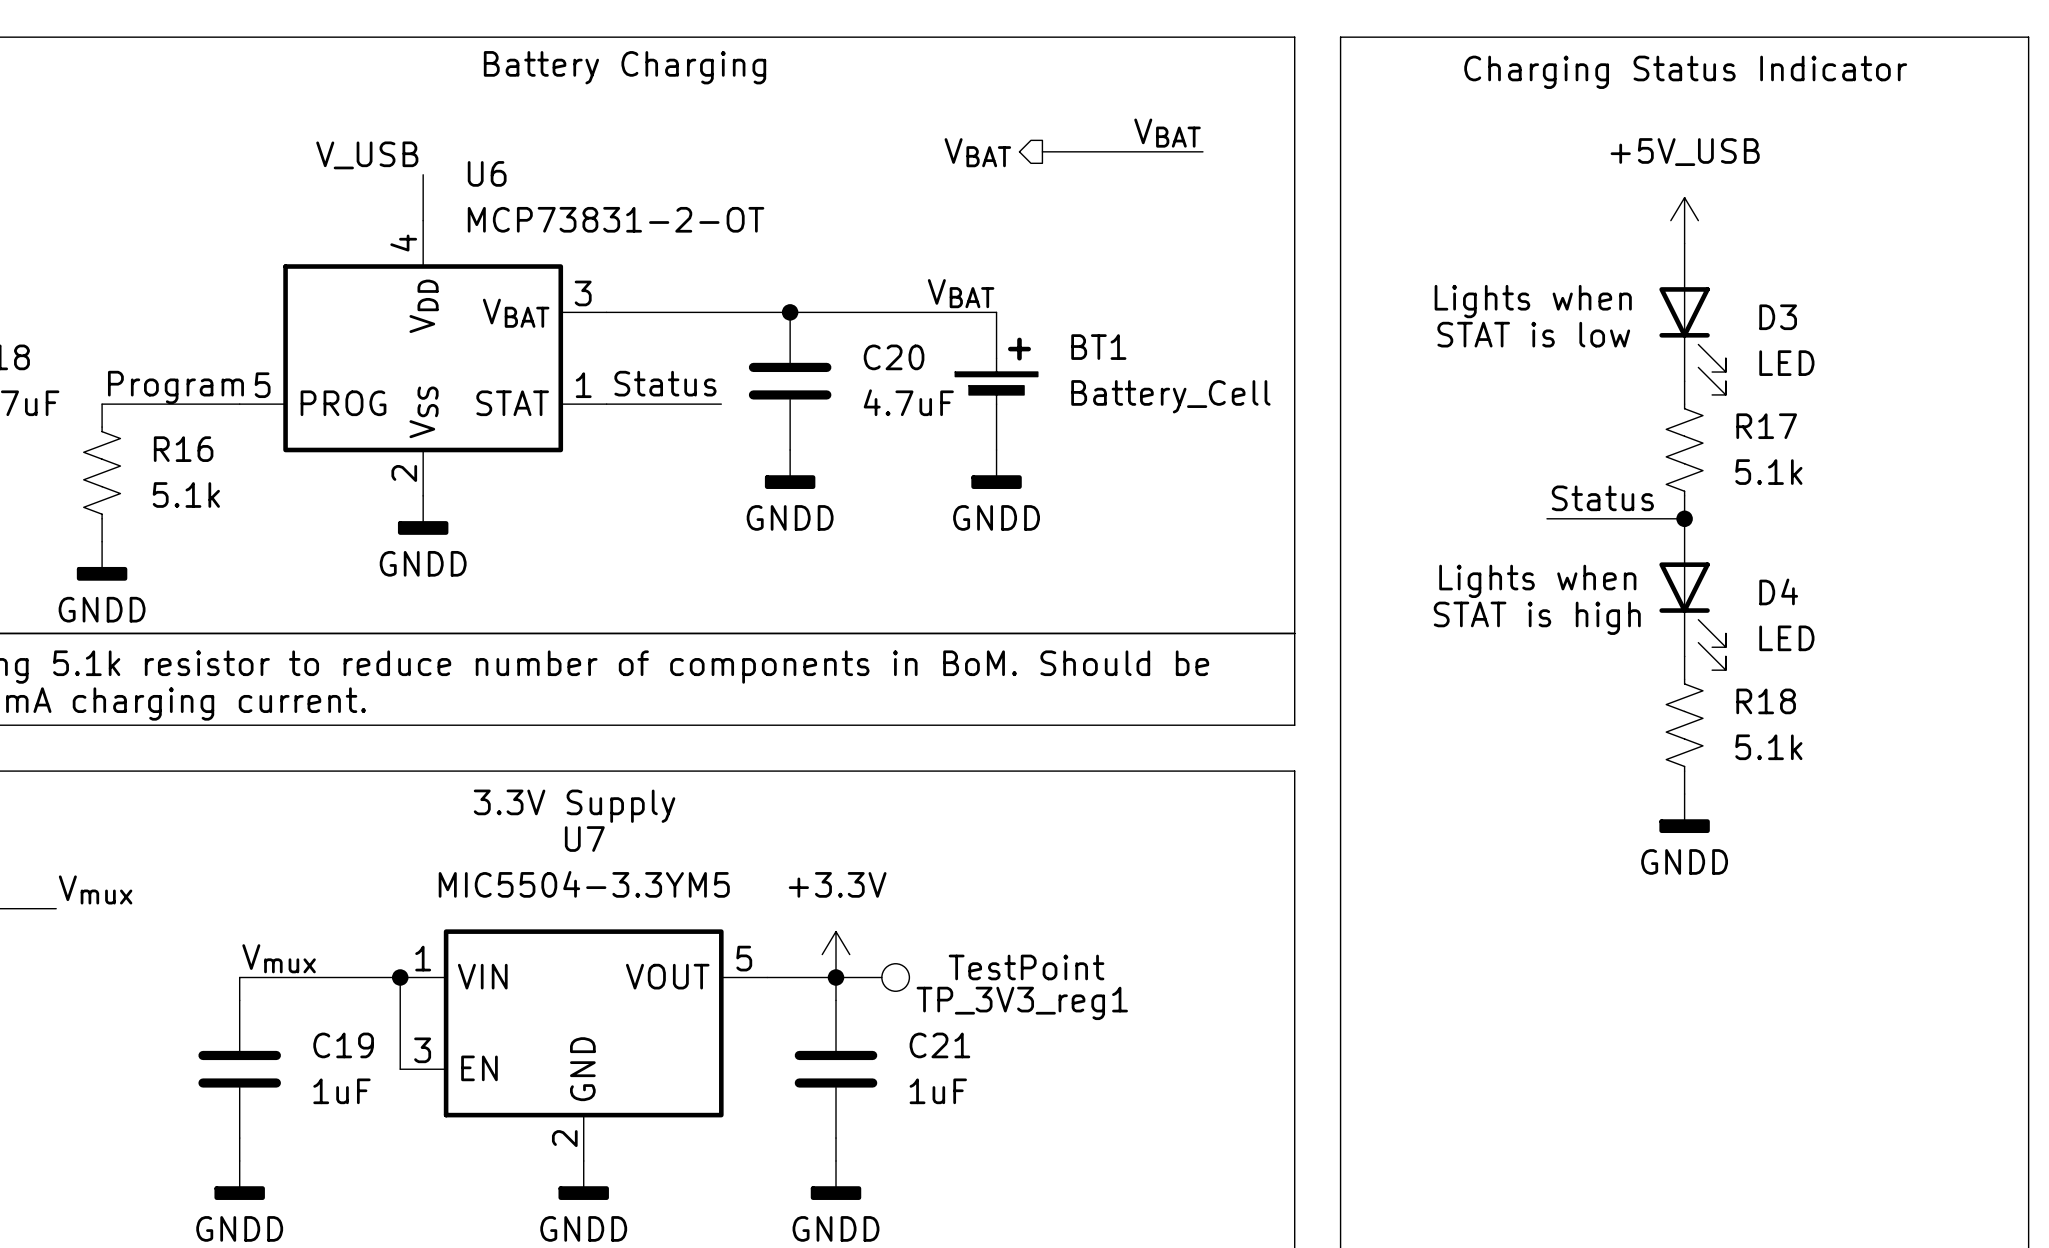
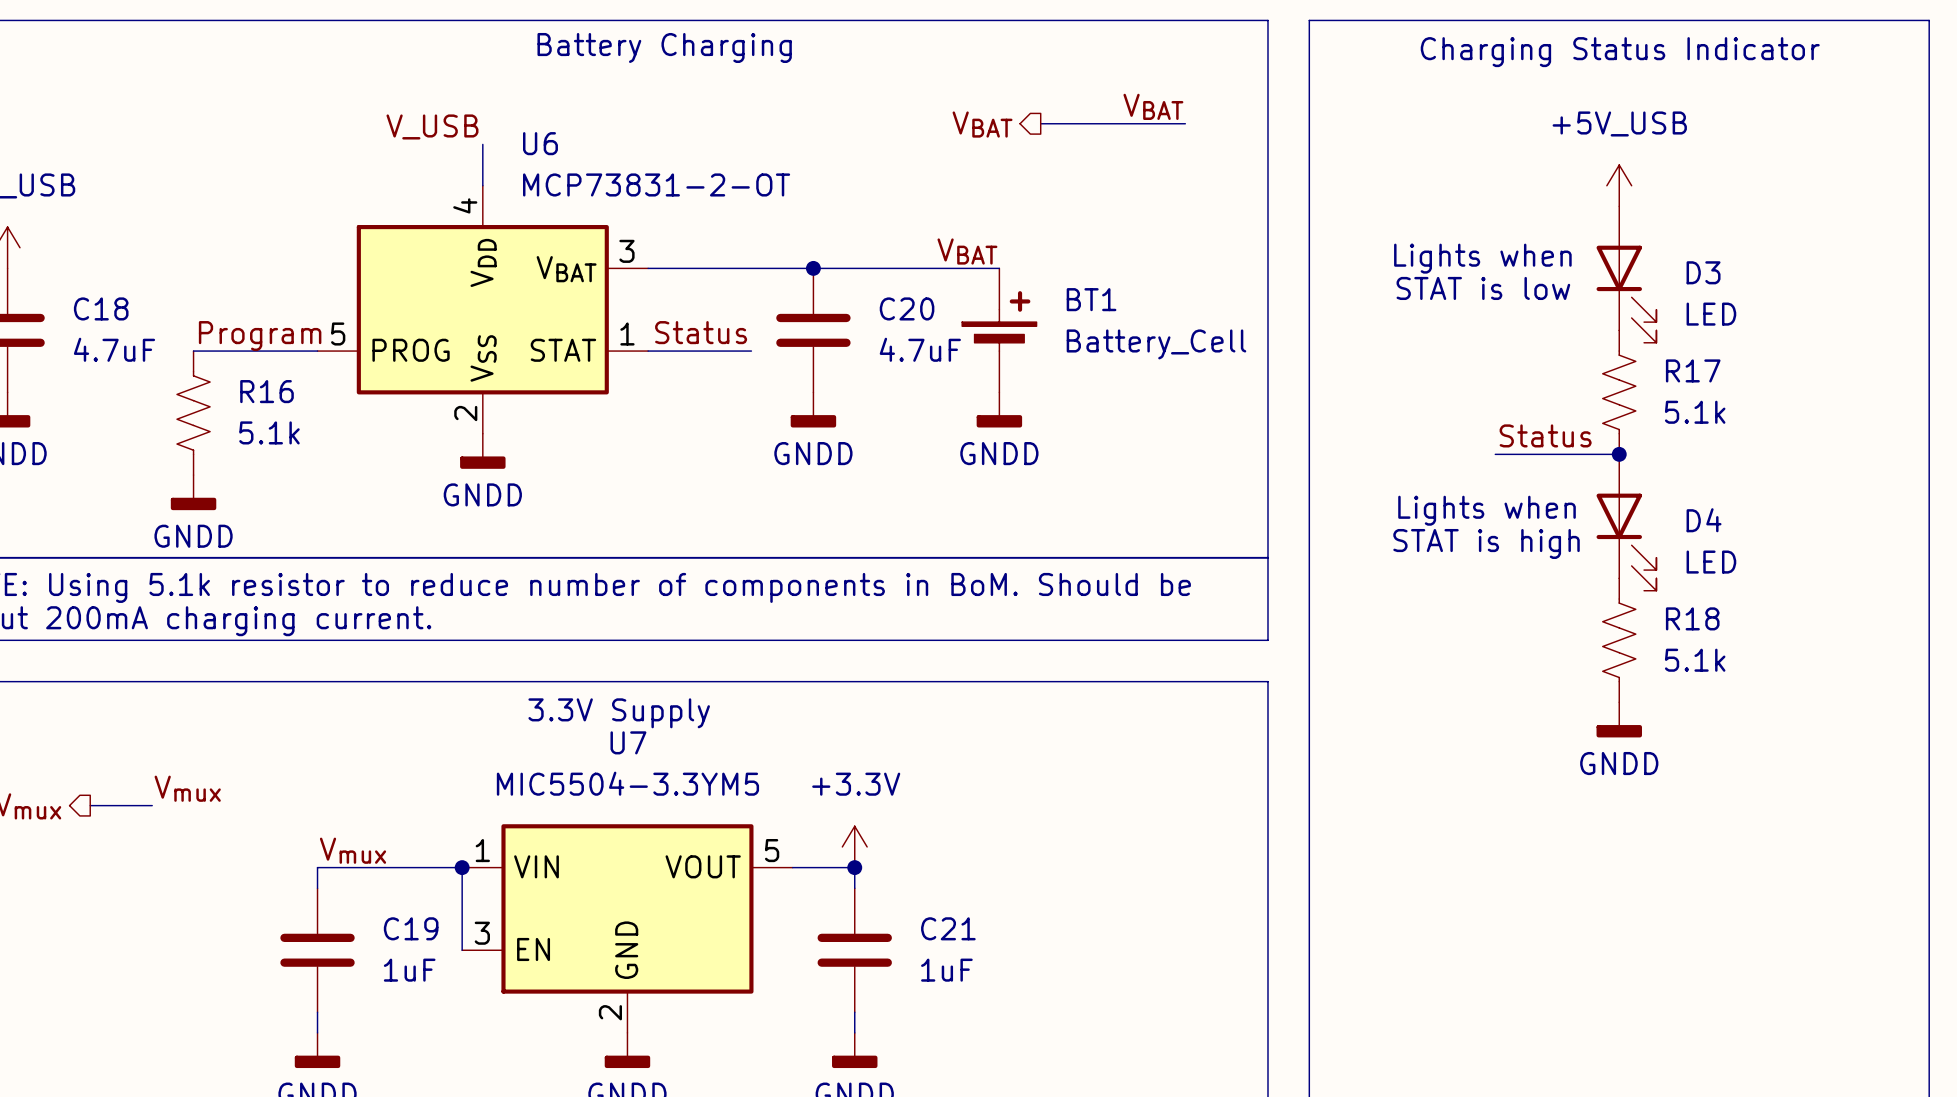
TP_3V3_reg1: TestPoint (872, 977) -> none

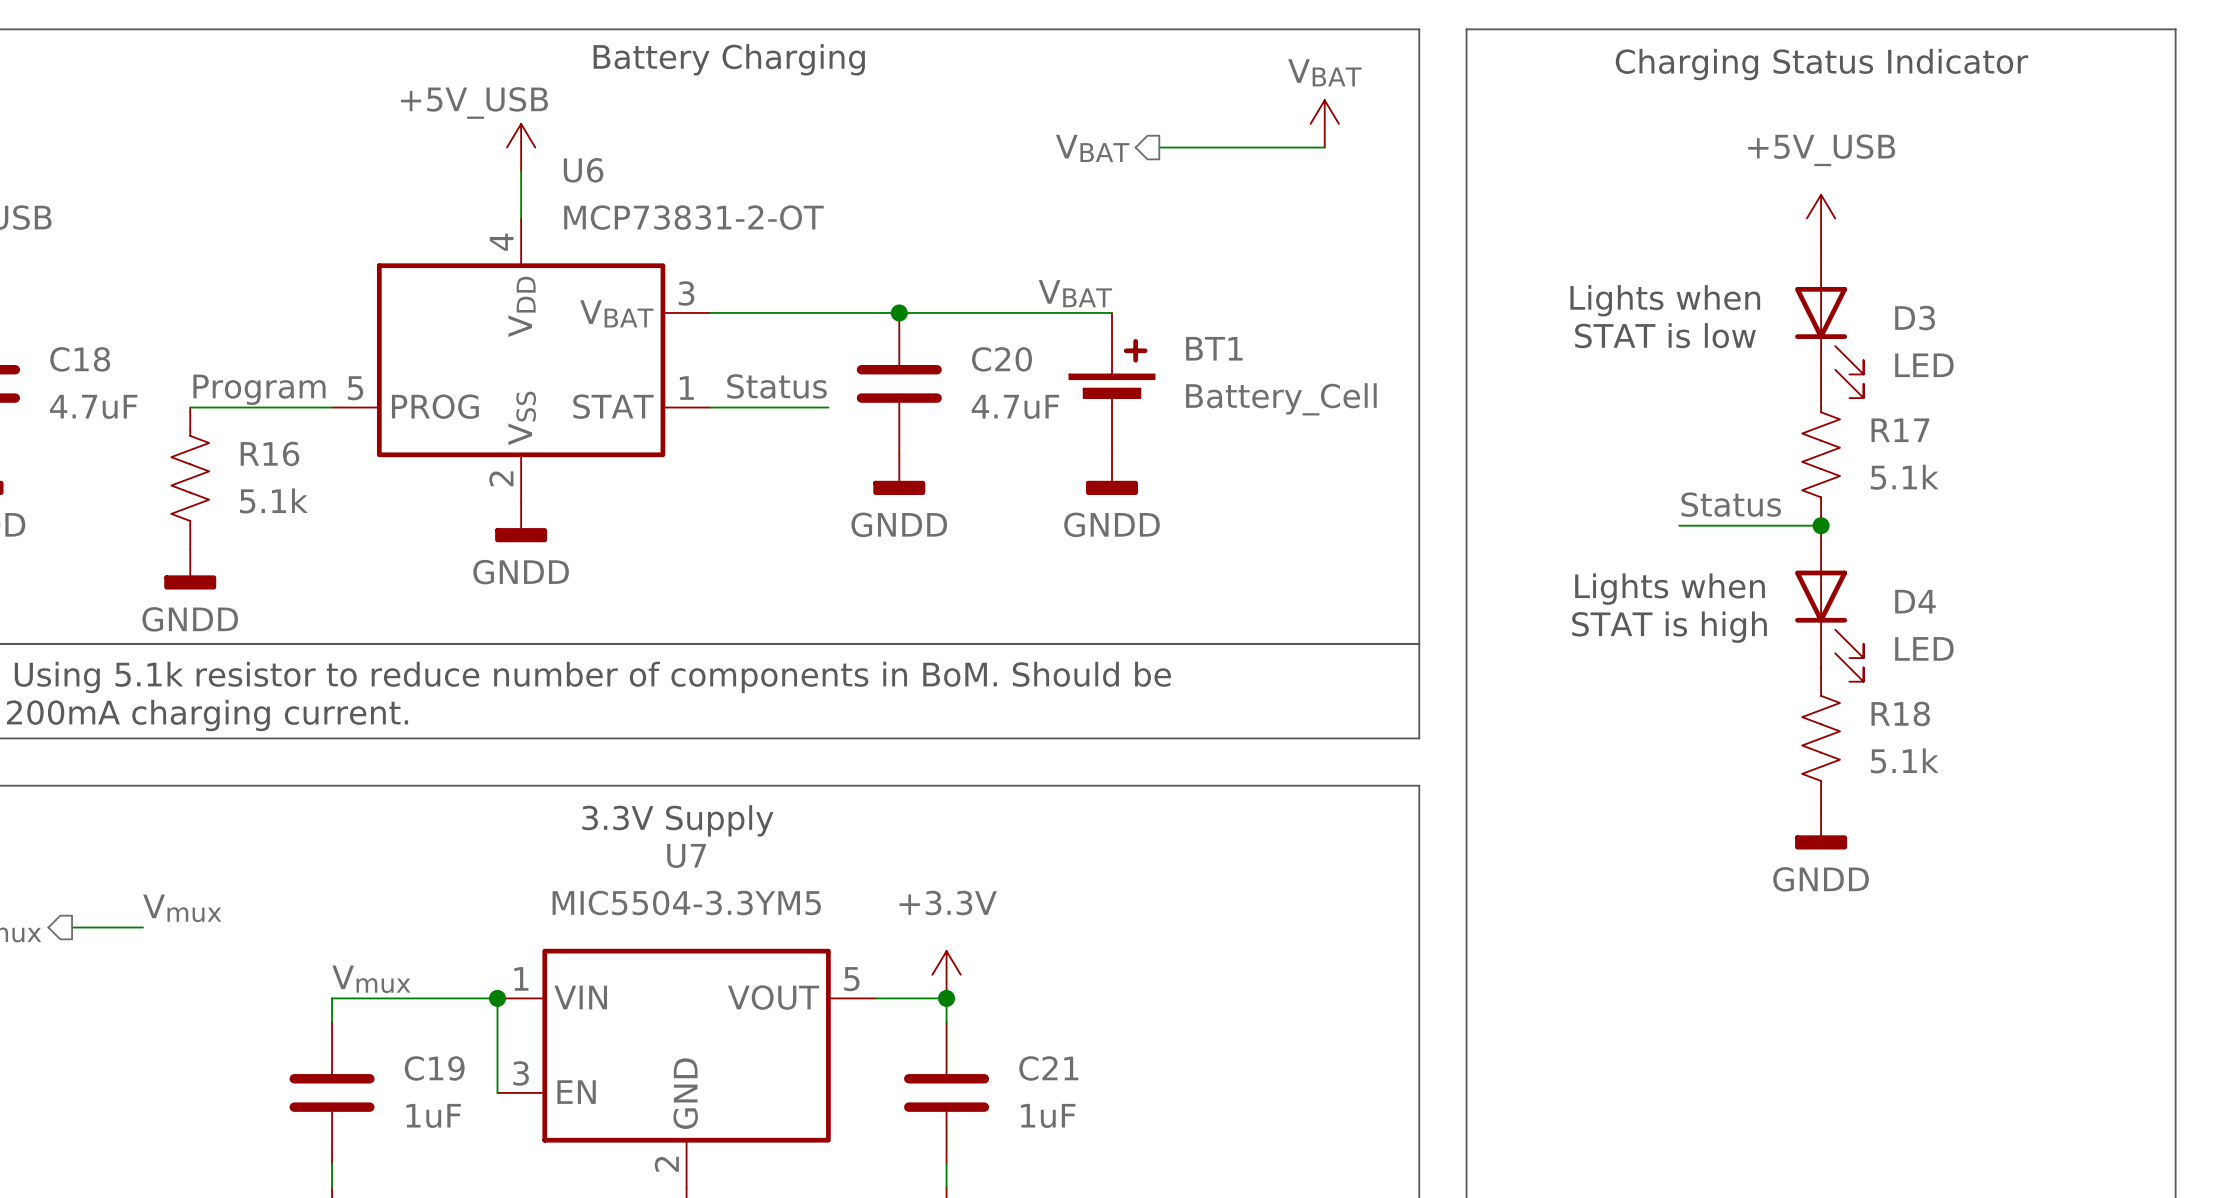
power symbol: none -> VBAT (1324, 123)
label: VBAT (1153, 106) -> none
power symbol: none -> +5V_USB (521, 147)
label: V_USB (432, 126) -> none

